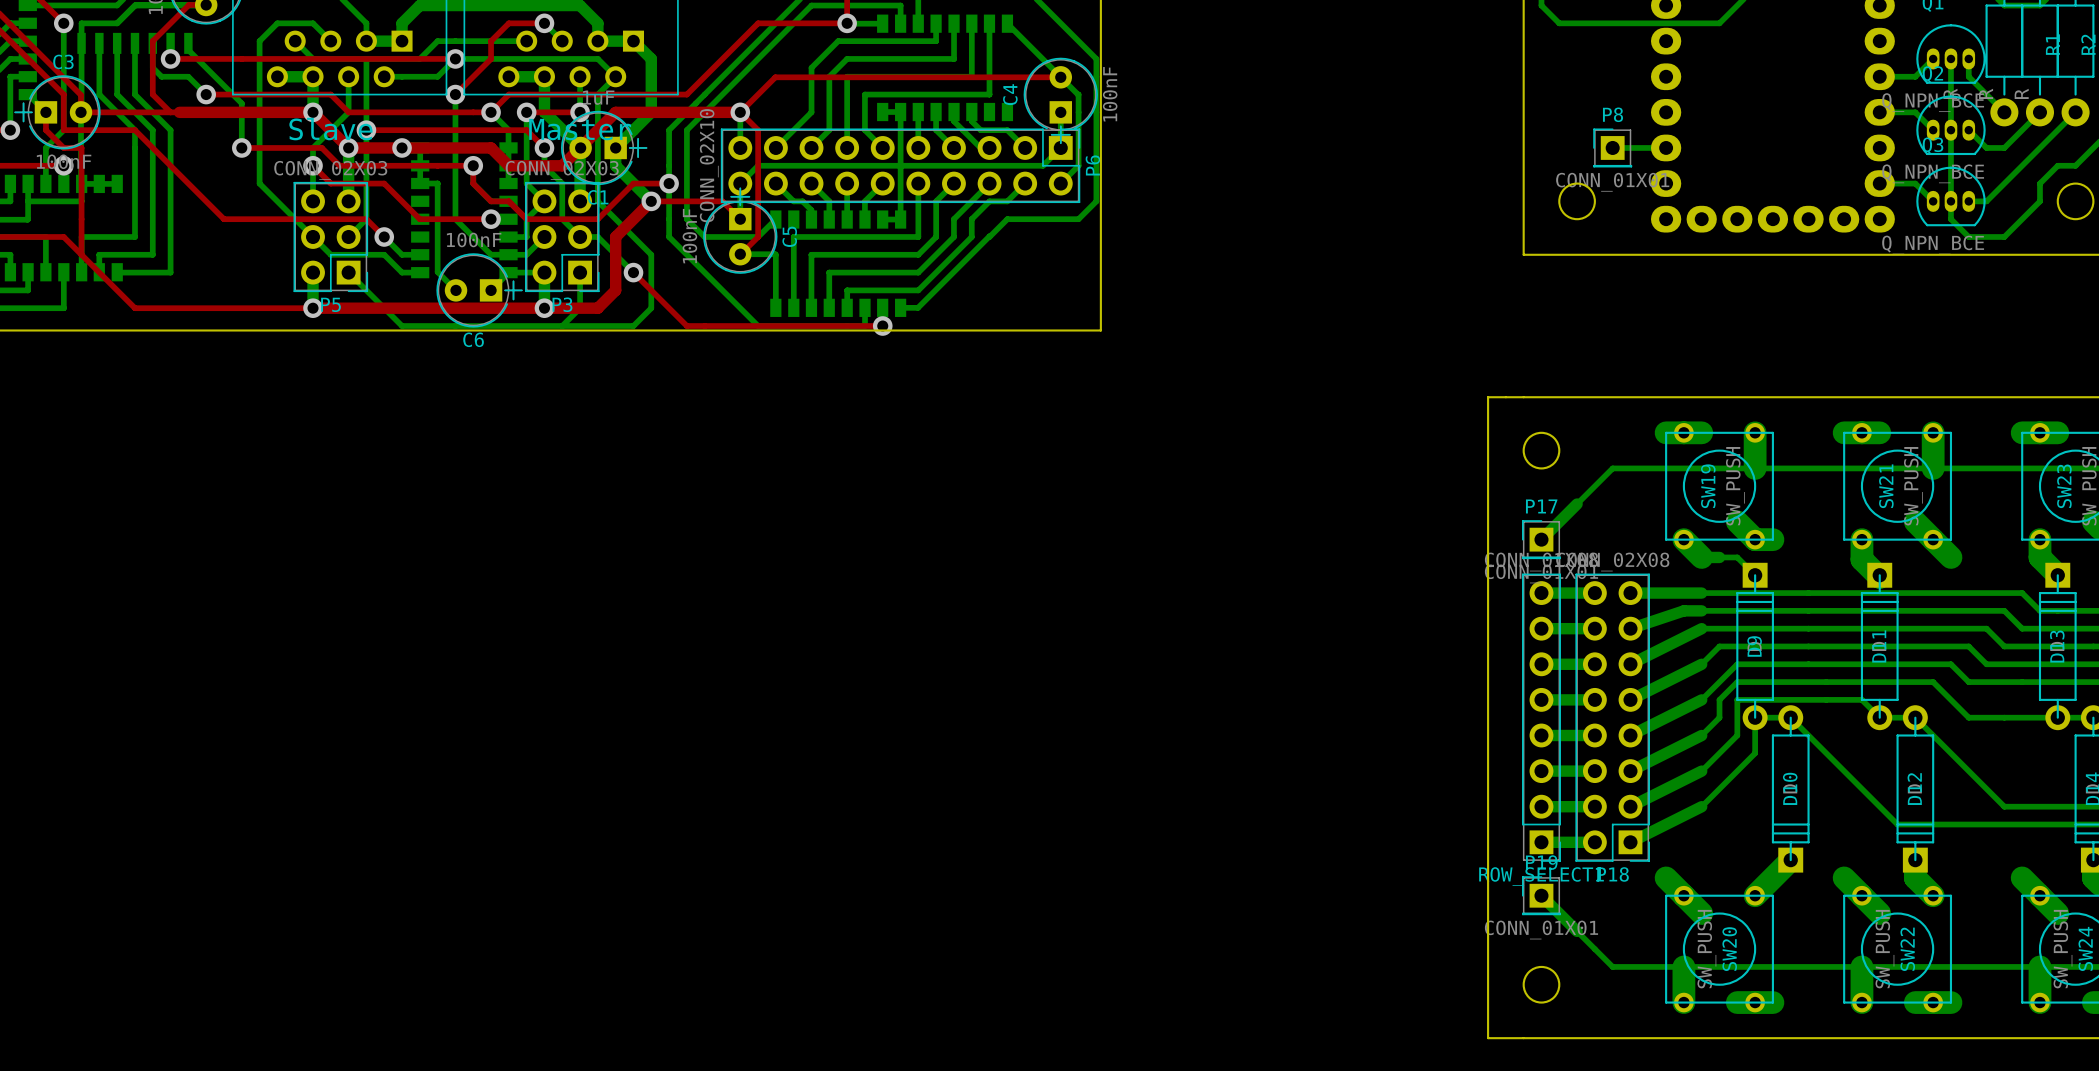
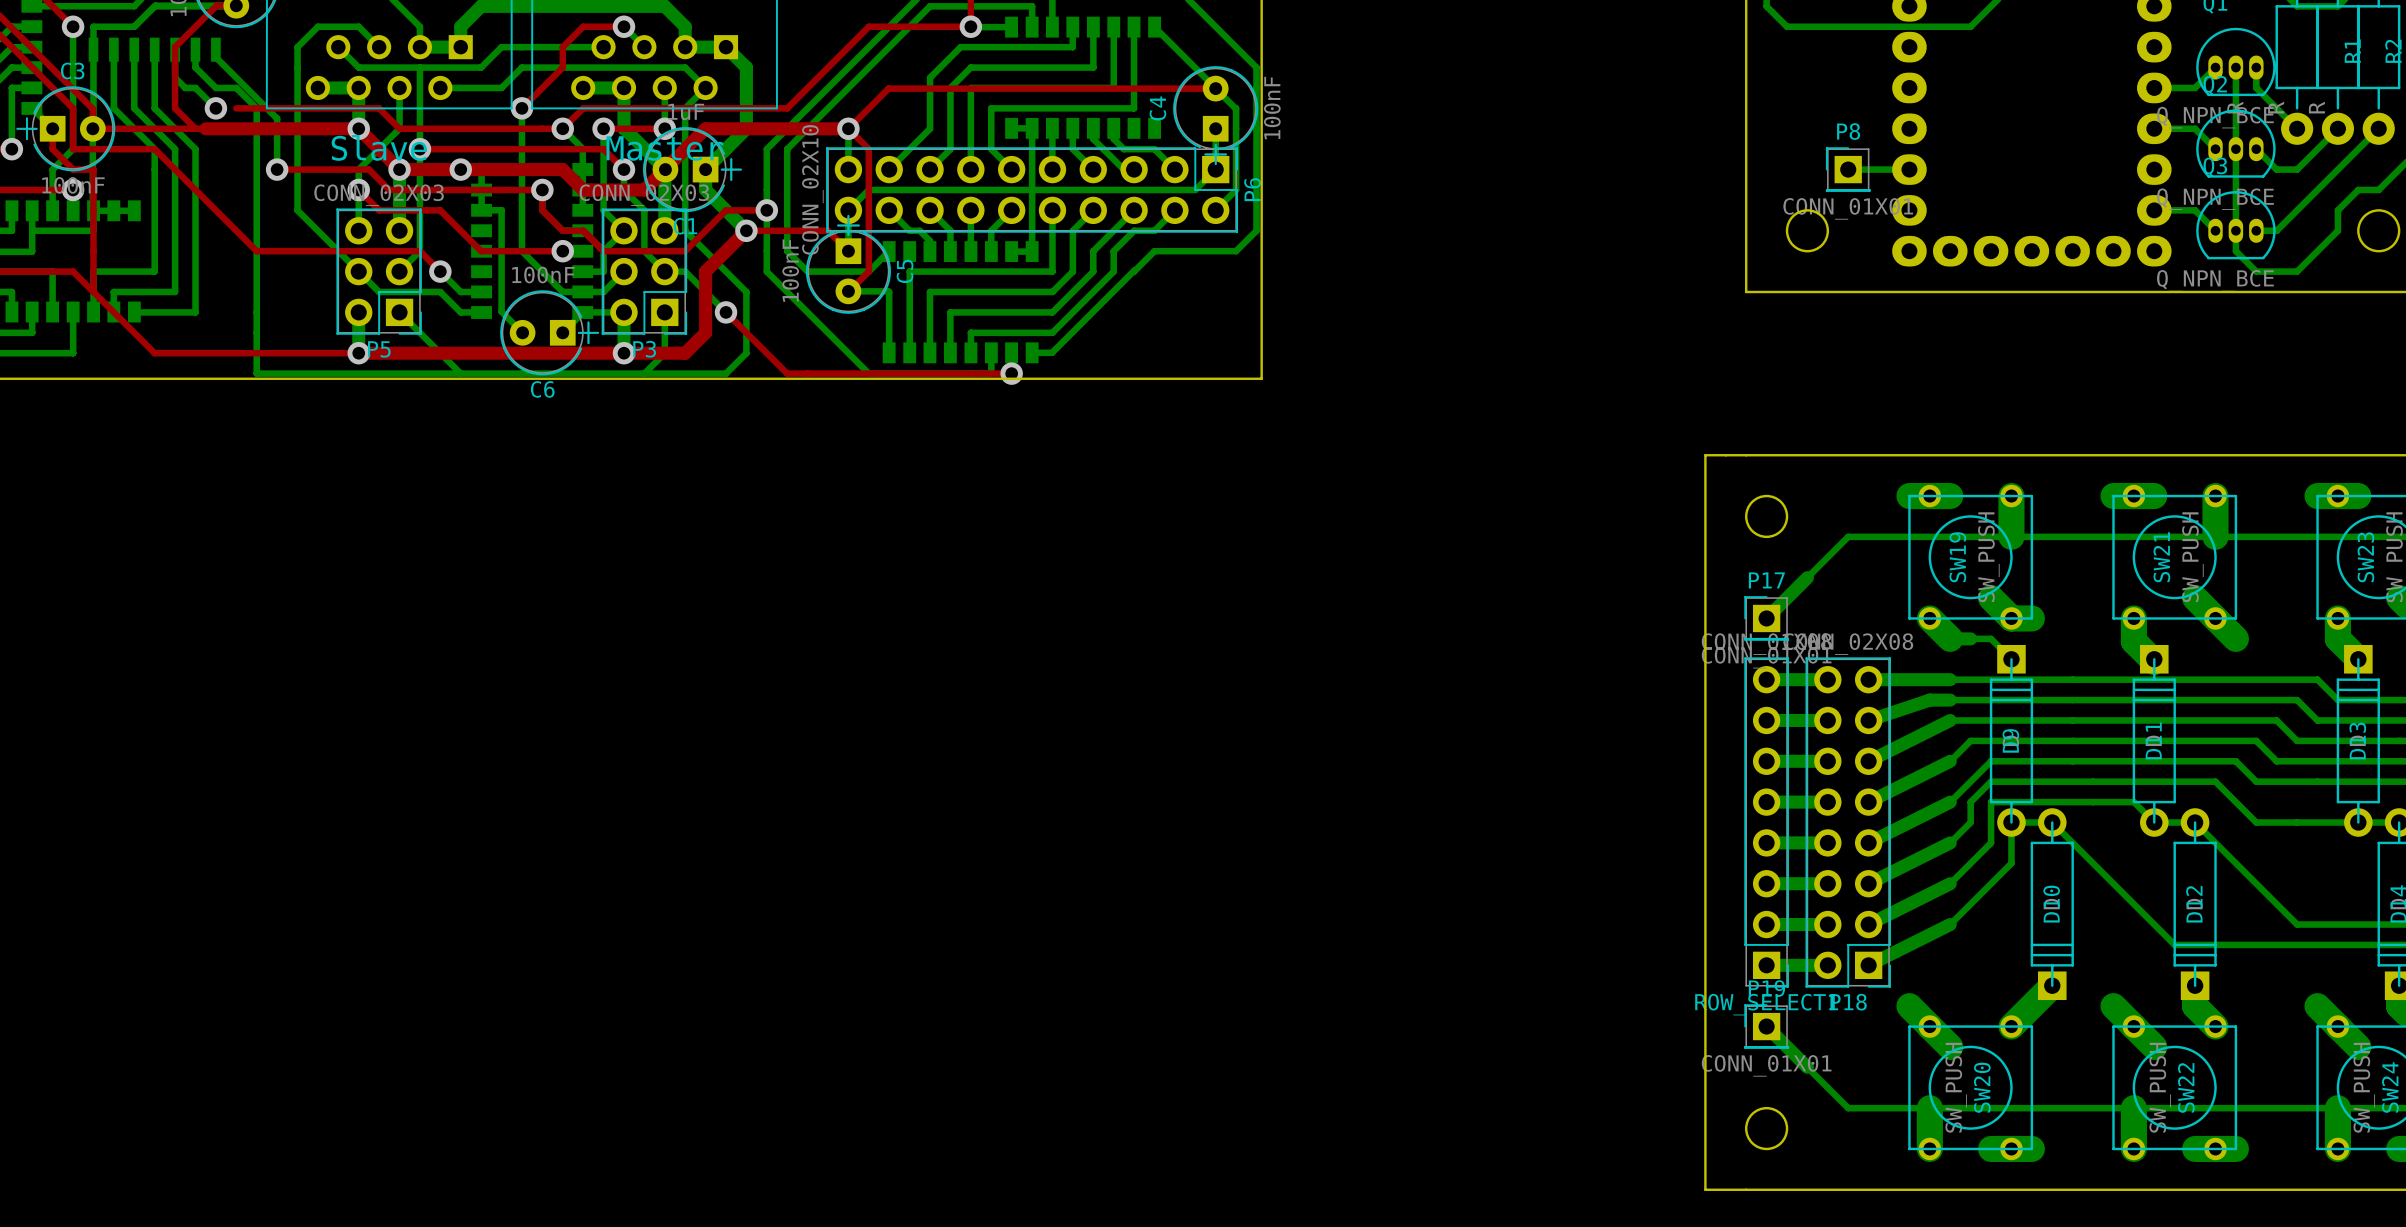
bottom track: none -> (195, 67) (215, 87) (236, 87) (256, 108) (256, 373) (460, 373)
top track: (170, 58) (455, 58) -> none
via: (170, 58) -> none
via: (455, 58) -> none
bottom track: (170, 76) (188, 76) (206, 94) -> (195, 87) (215, 108)
via position: (206, 94) -> (215, 108)

